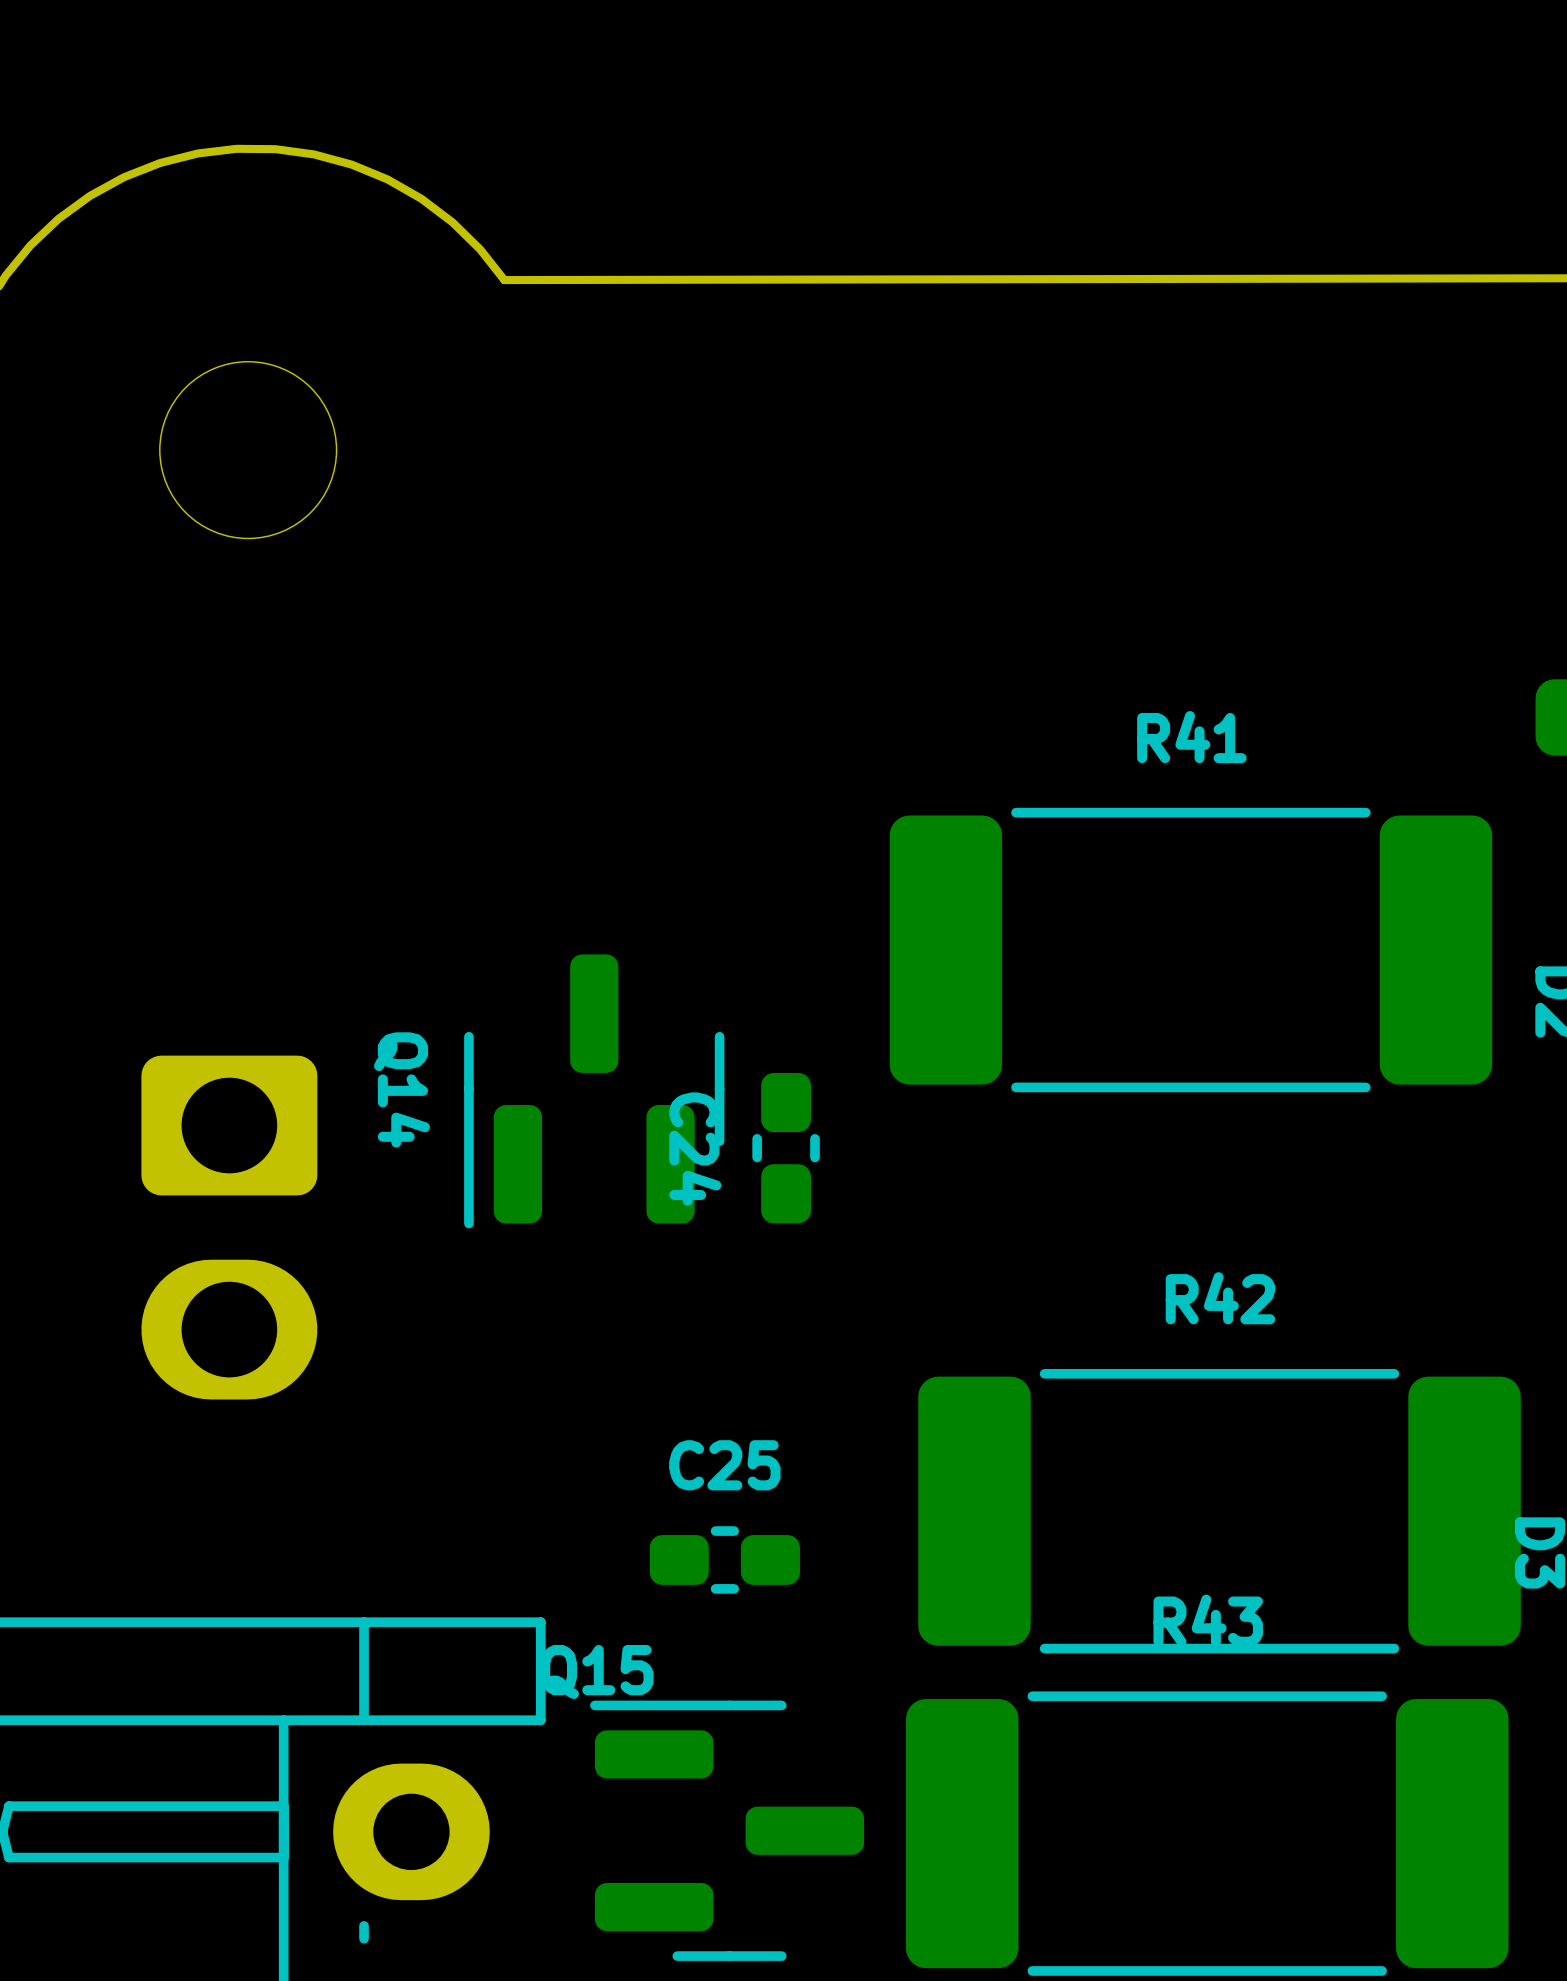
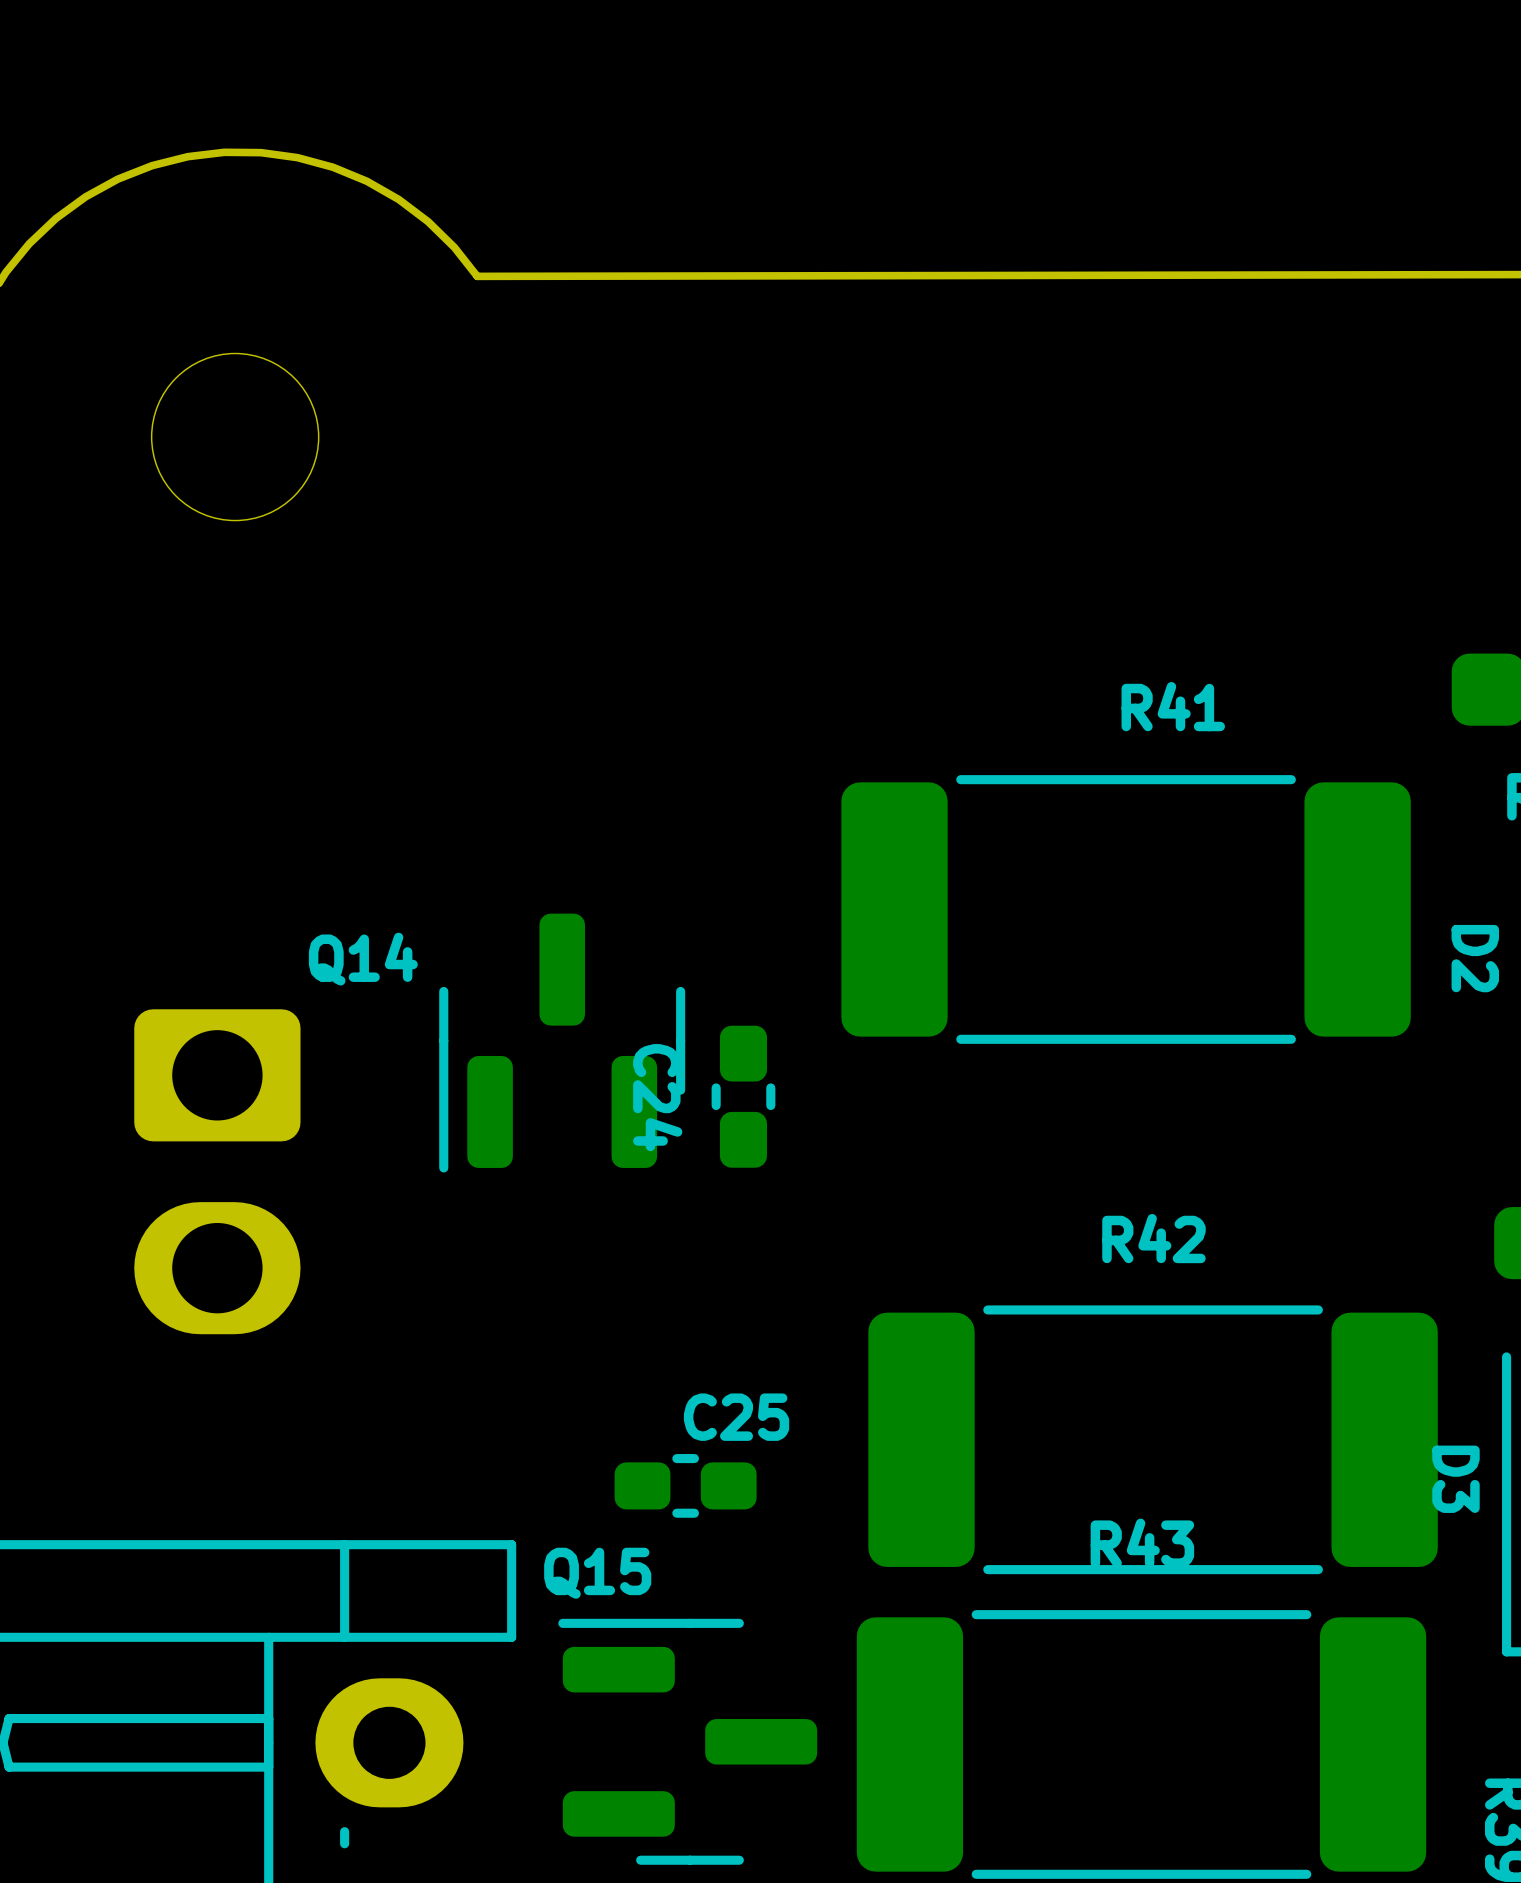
R41 name position: R41 (1191, 737) -> R41 (1173, 706)
Q14 name rotation: 0° (402, 1089) -> 90° counterclockwise (363, 959)
C25 name position: C25 (724, 1465) -> C25 (736, 1417)
Q15 name position: Q15 (596, 1672) -> Q15 (597, 1573)

